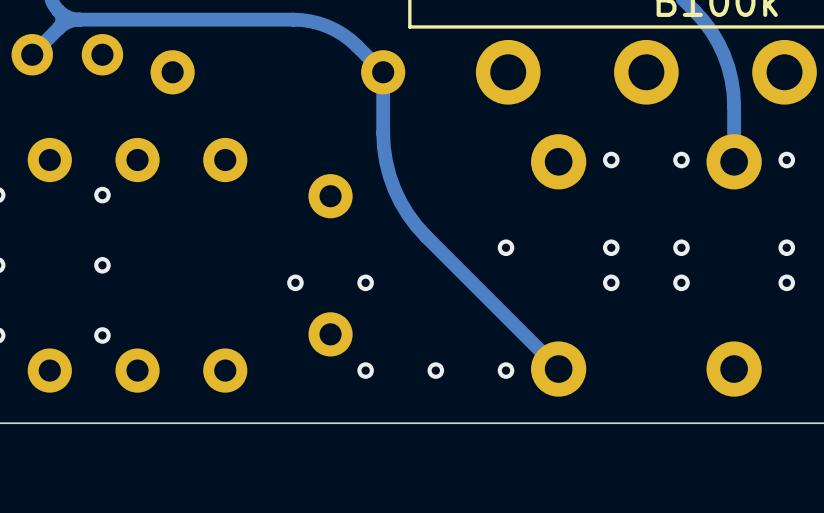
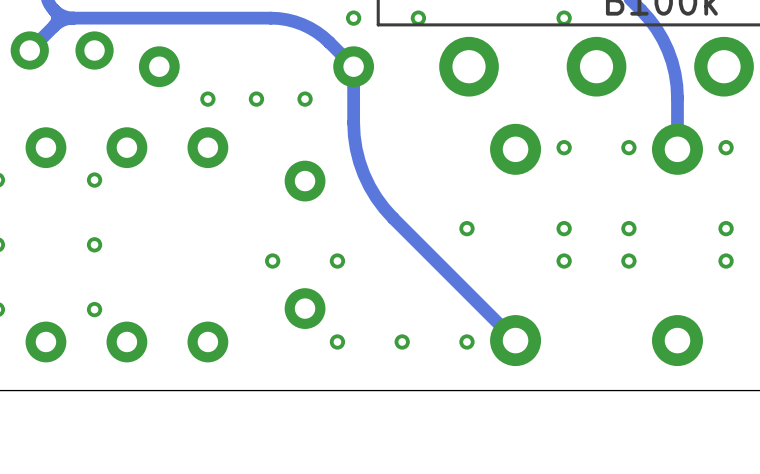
via: none -> (353, 18)
via: none -> (418, 18)
via: none -> (564, 18)
via: none -> (207, 99)
via: none -> (256, 99)
via: none -> (305, 99)

